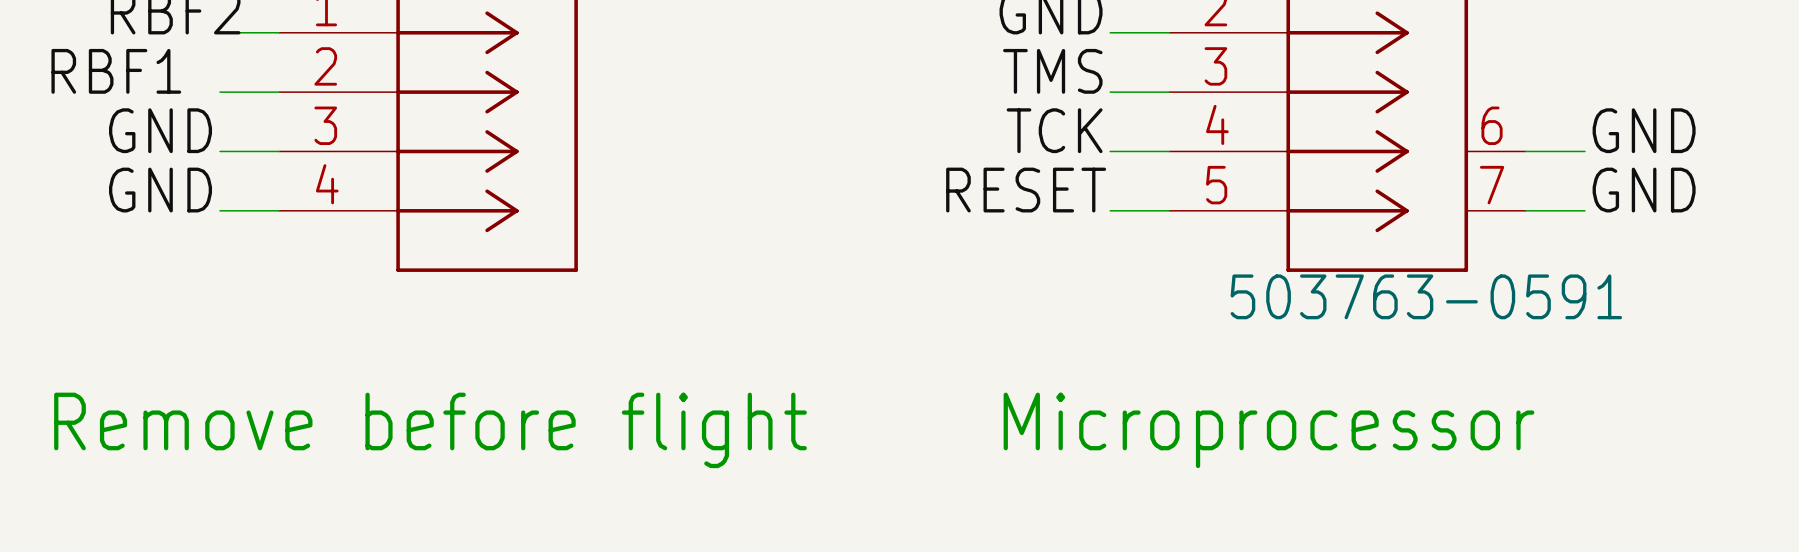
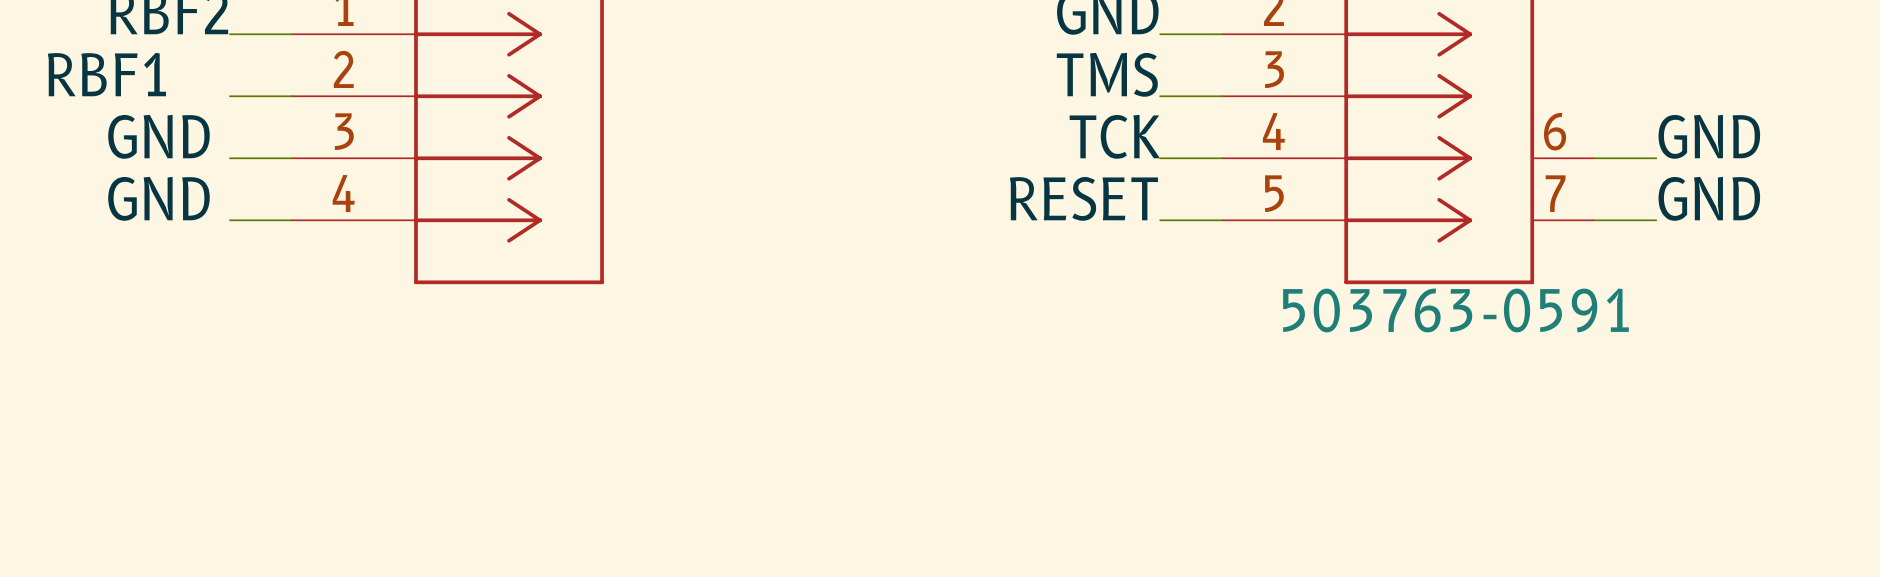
text: Remove before flight (430, 430) -> none
text: Microprocessor (1269, 430) -> none

